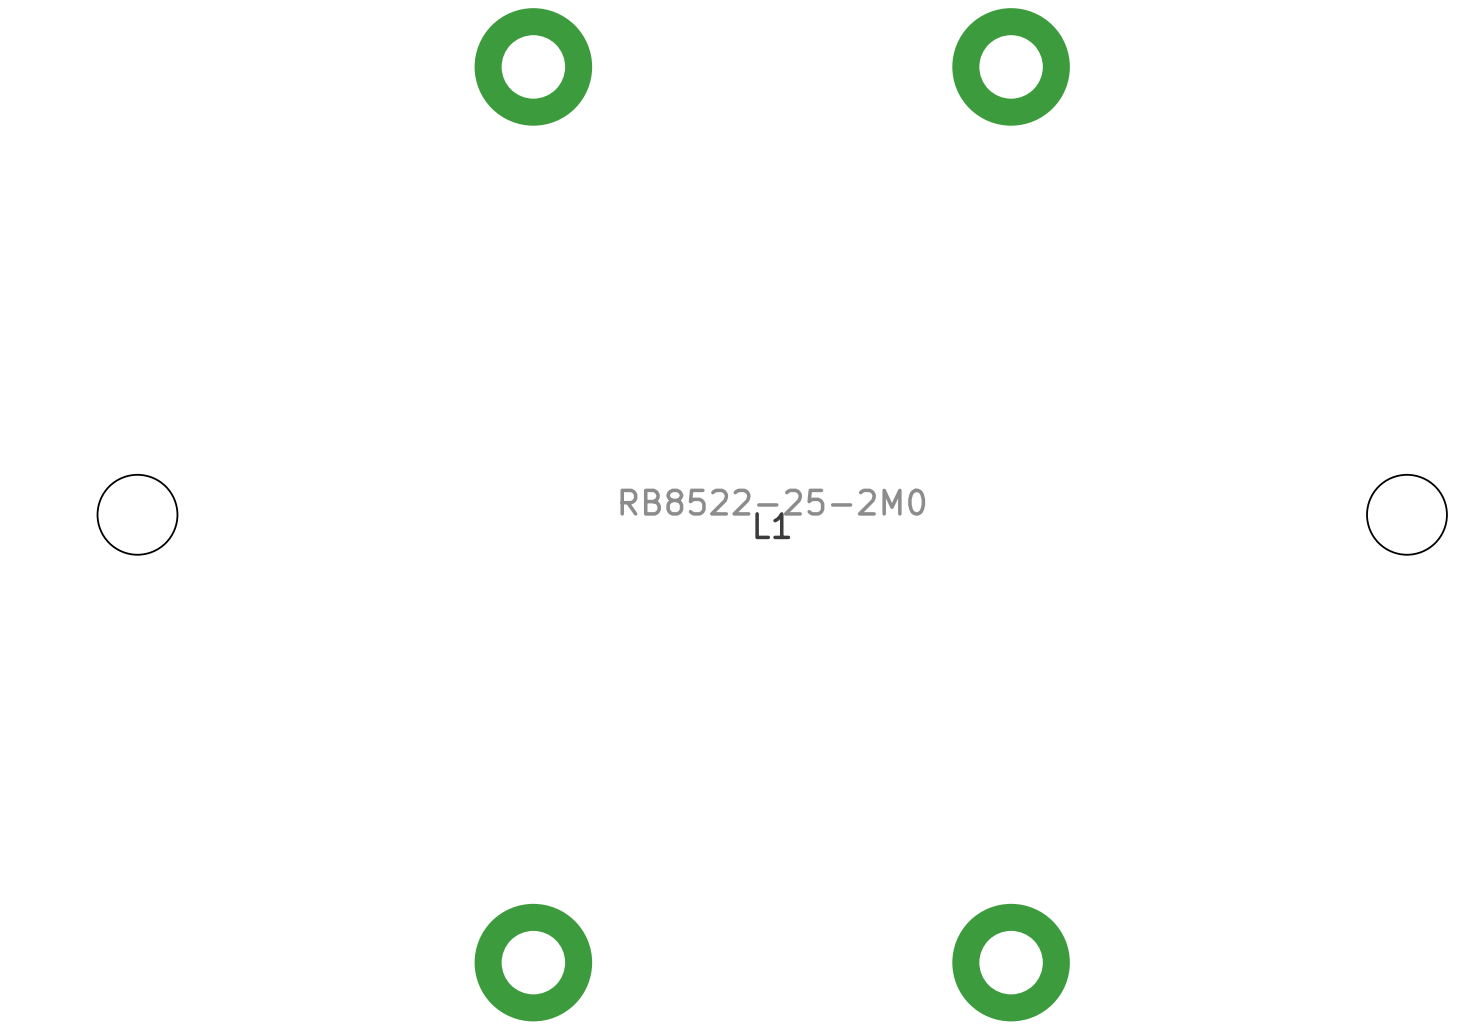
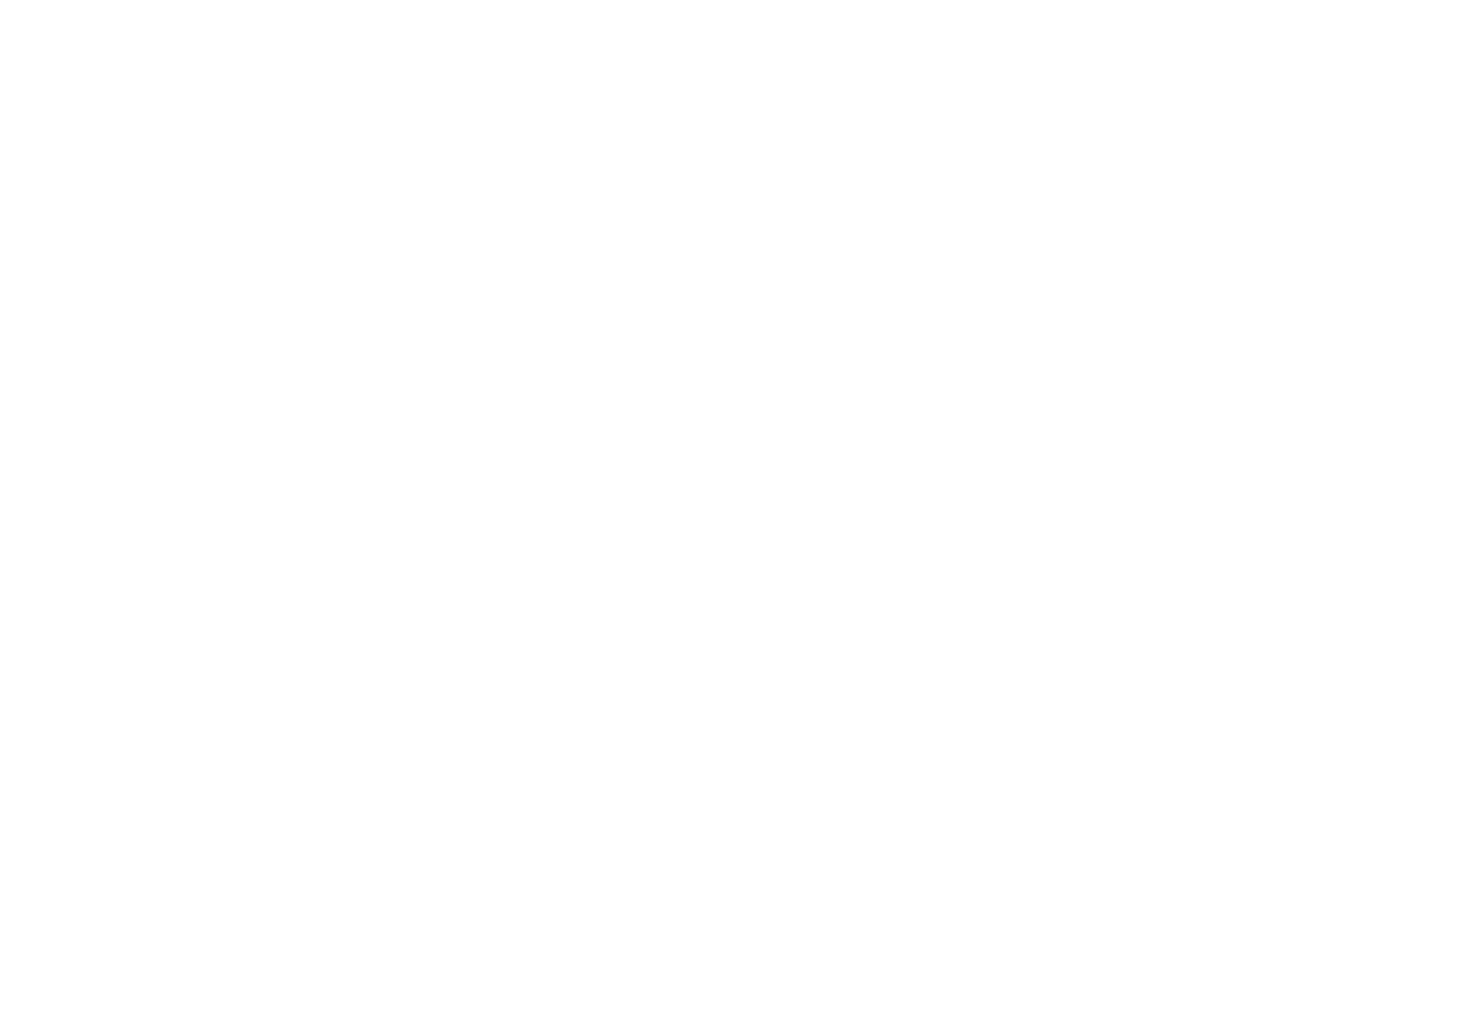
L1: RB8522-25-2M0 (772, 514) -> none

